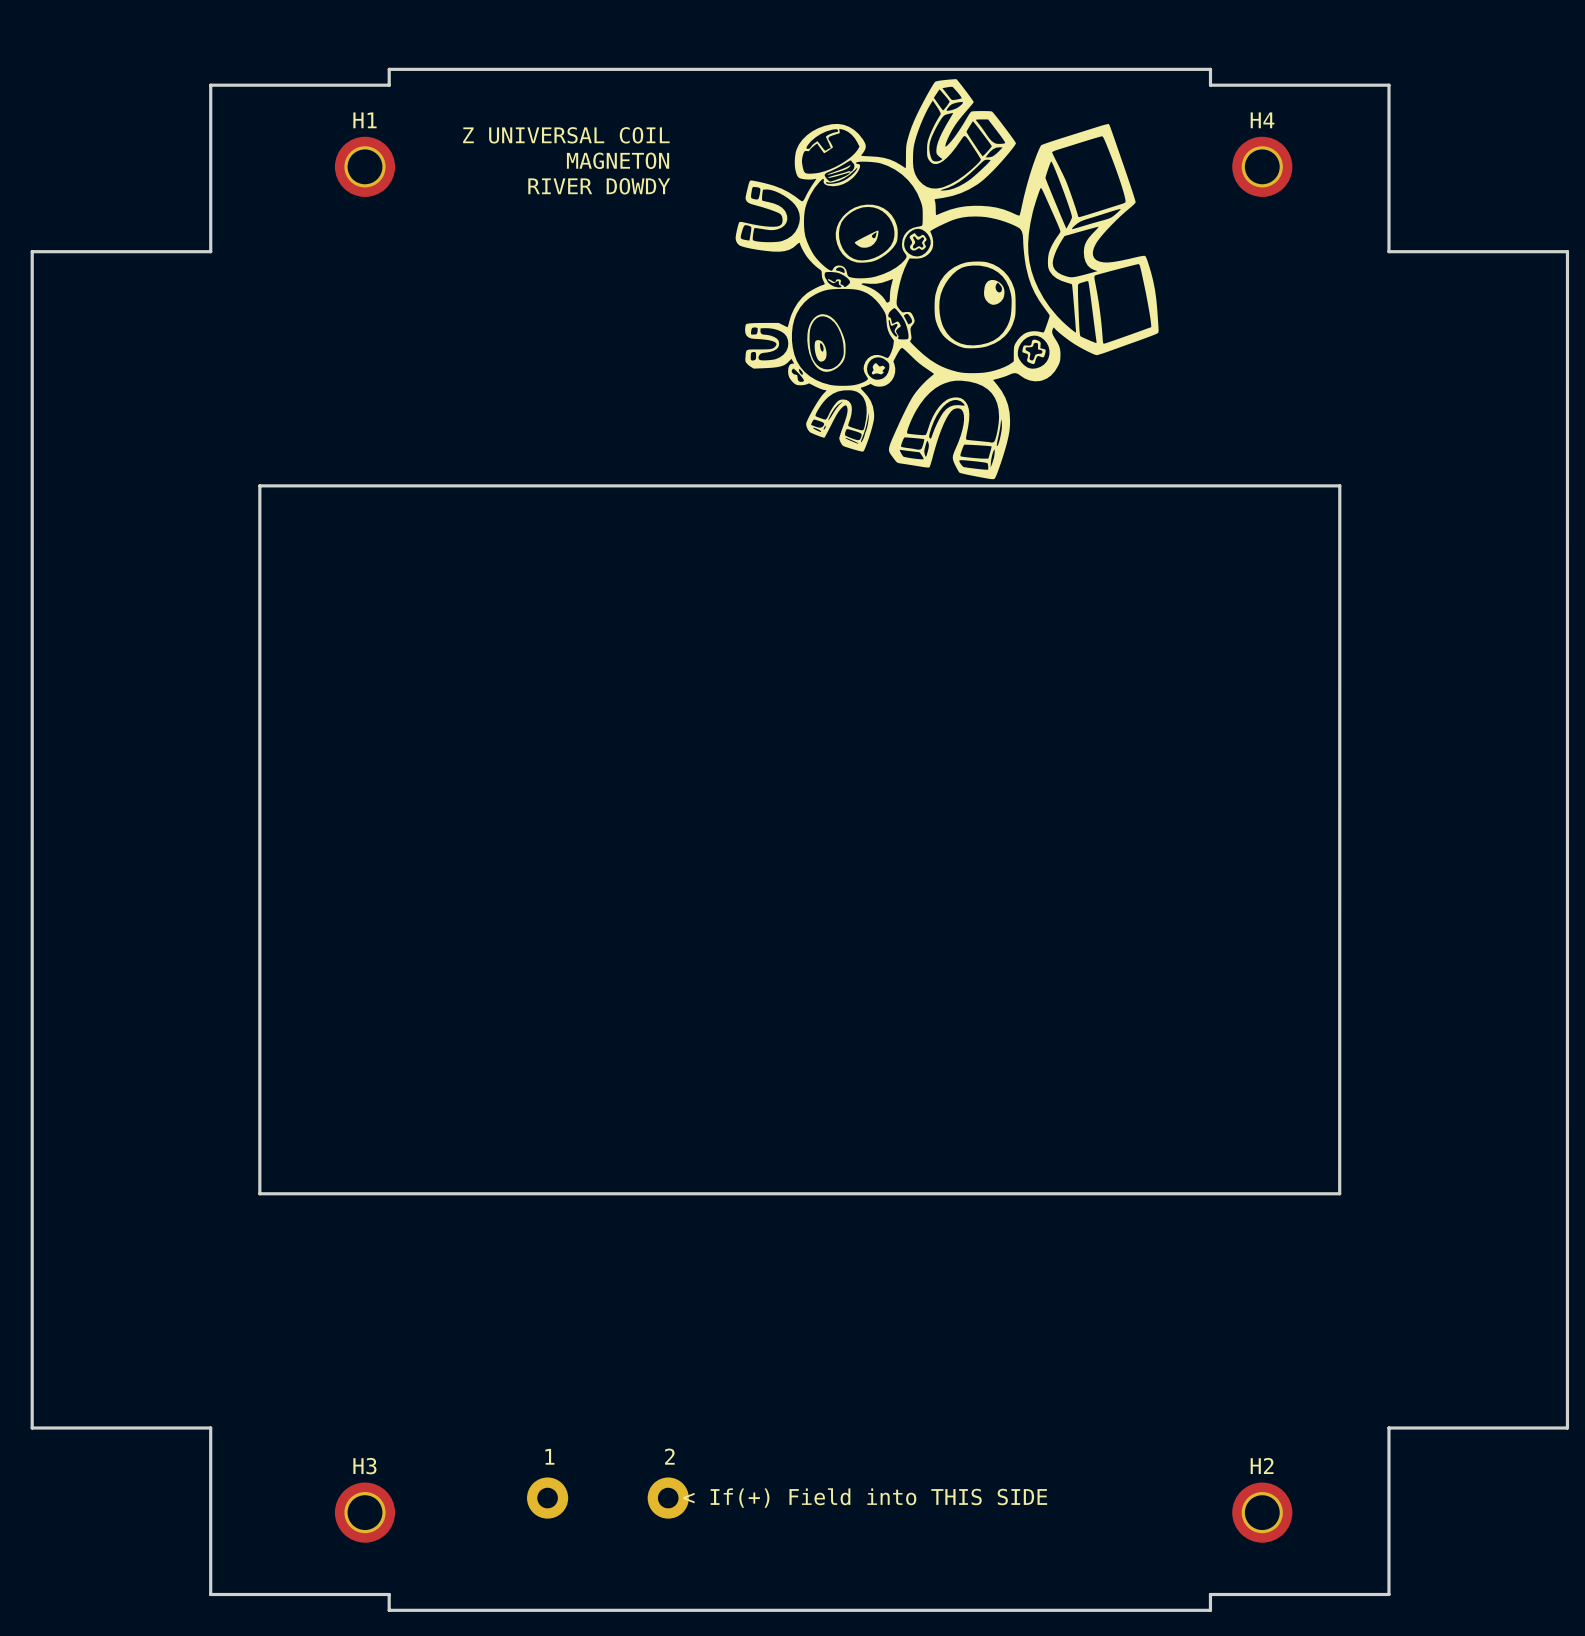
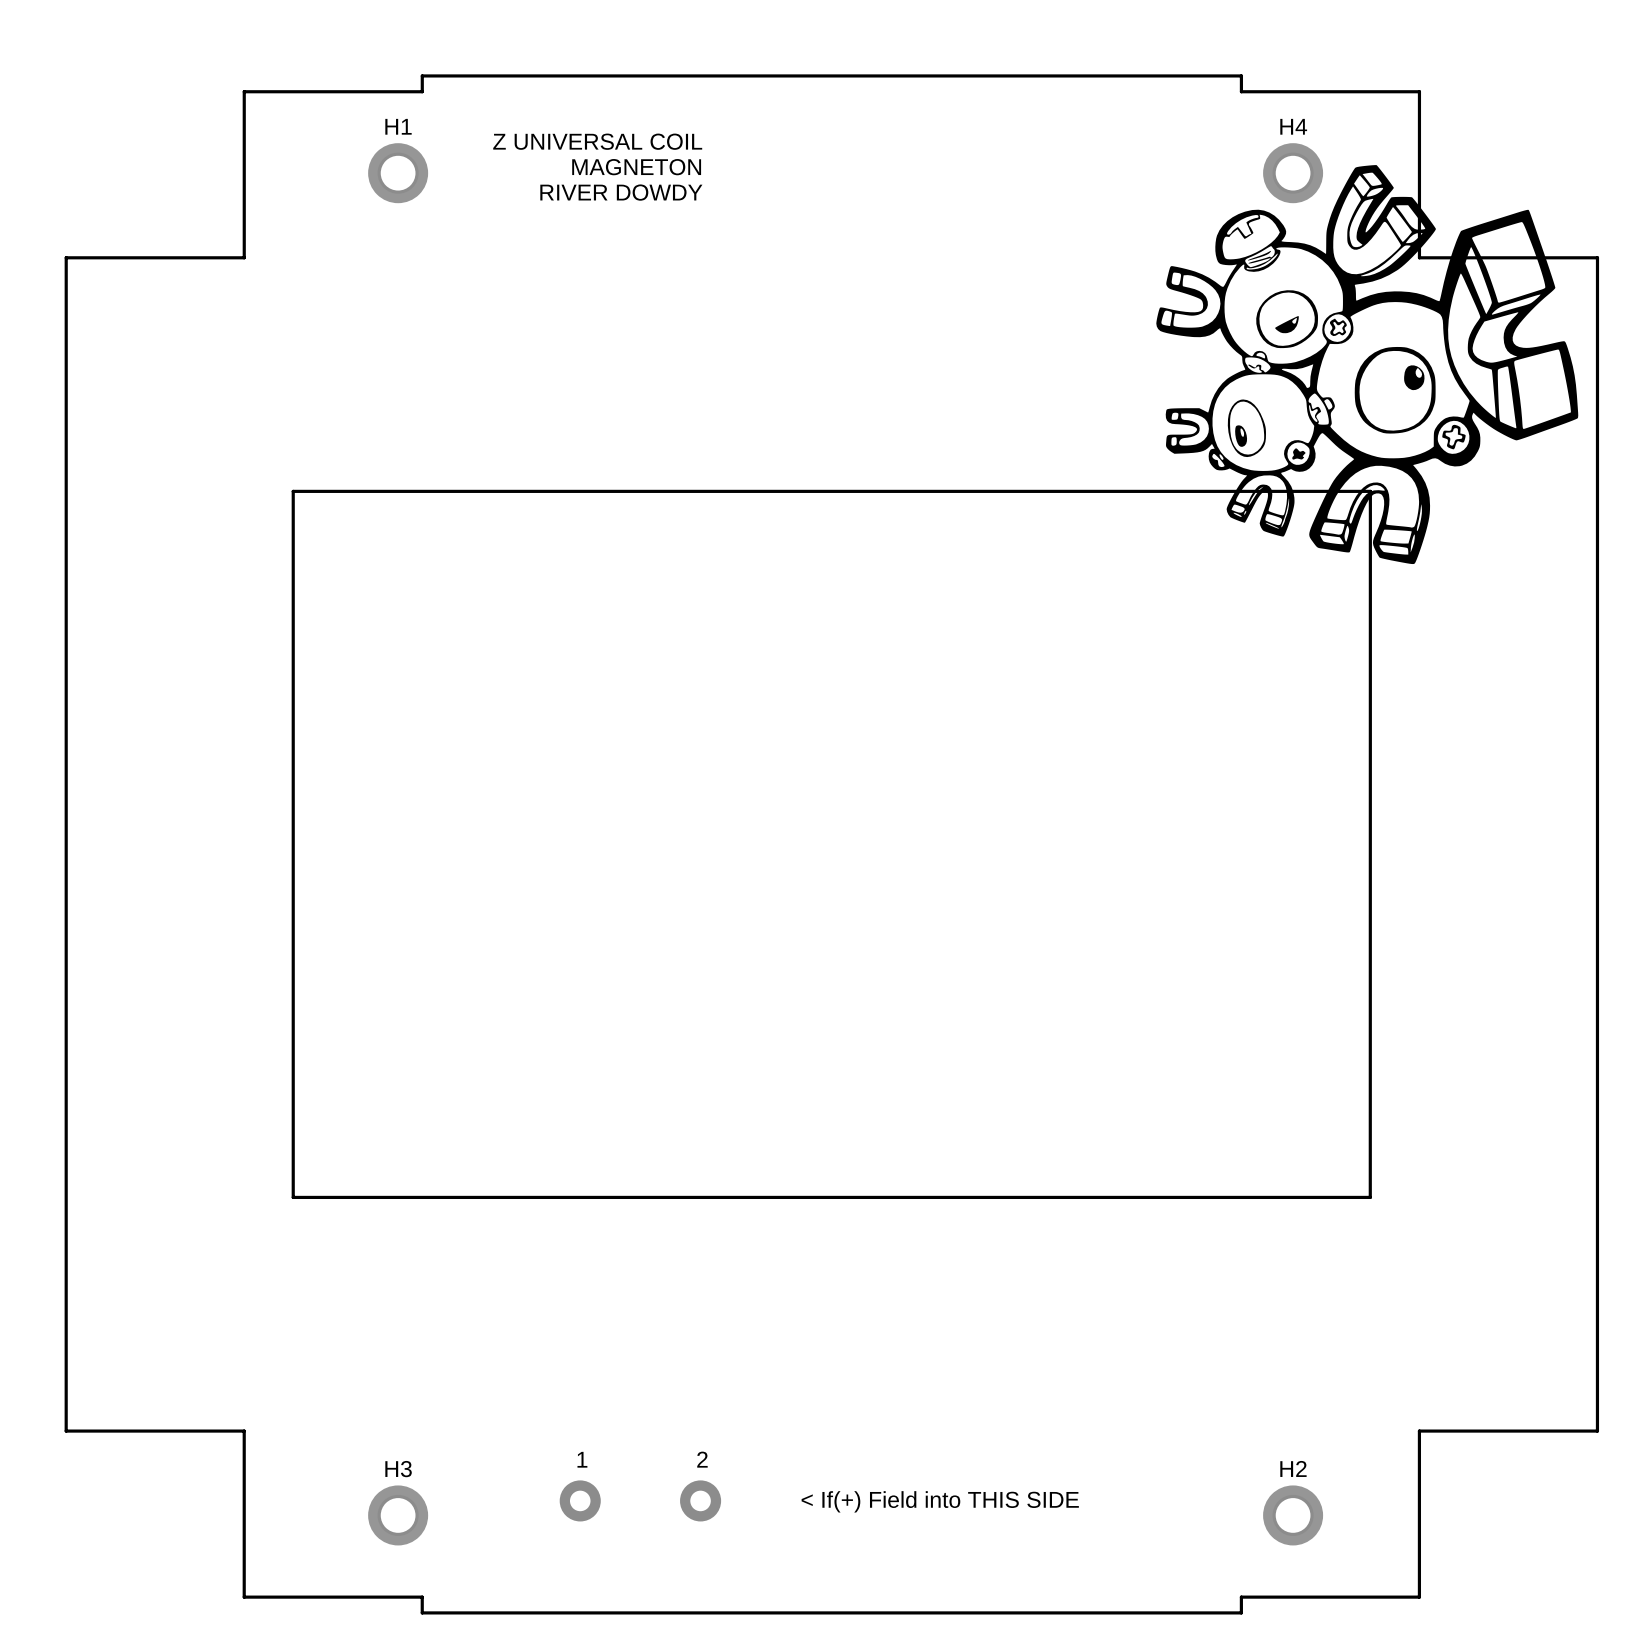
drawing: [735, 79, 1159, 480] -> none
drawing: none -> [1156, 165, 1579, 565]

